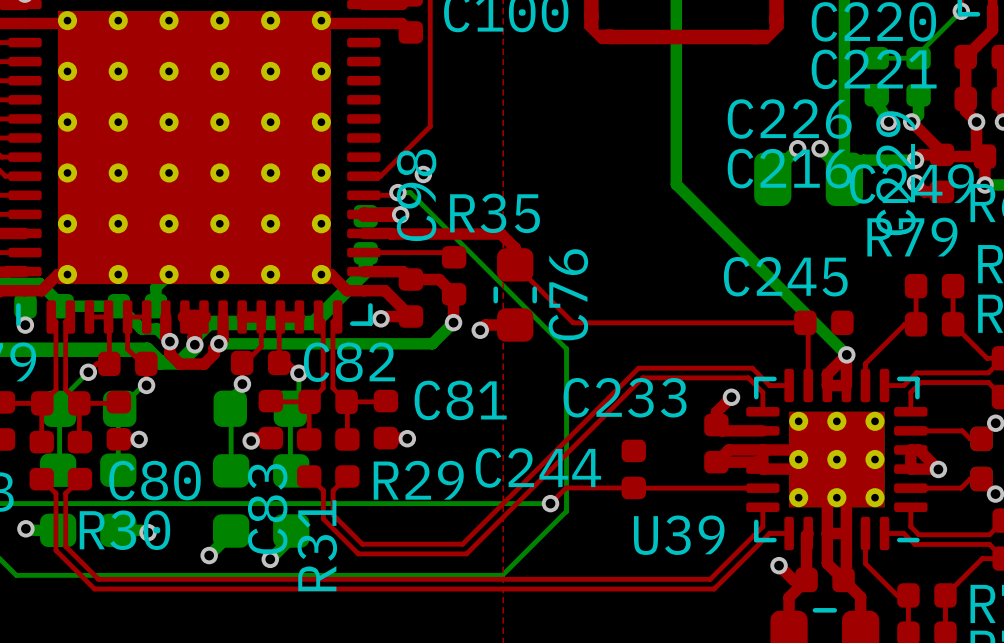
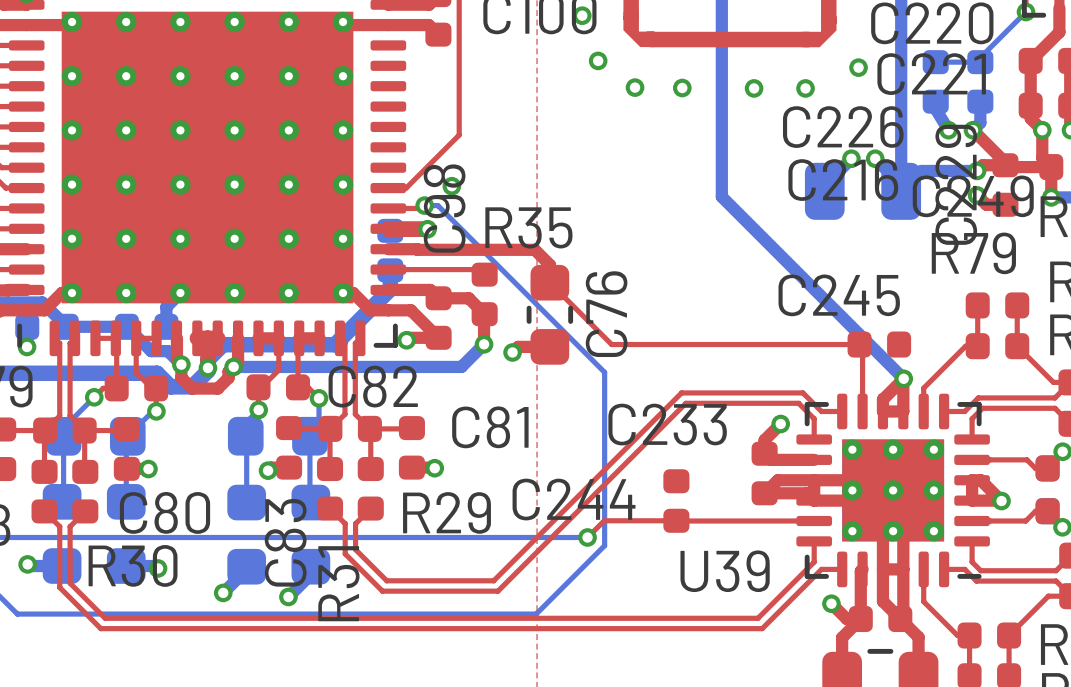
via: none -> (582, 15)
via: none -> (598, 60)
via: none -> (858, 67)
via: none -> (635, 87)
via: none -> (682, 88)
via: none -> (754, 88)
via: none -> (805, 88)

